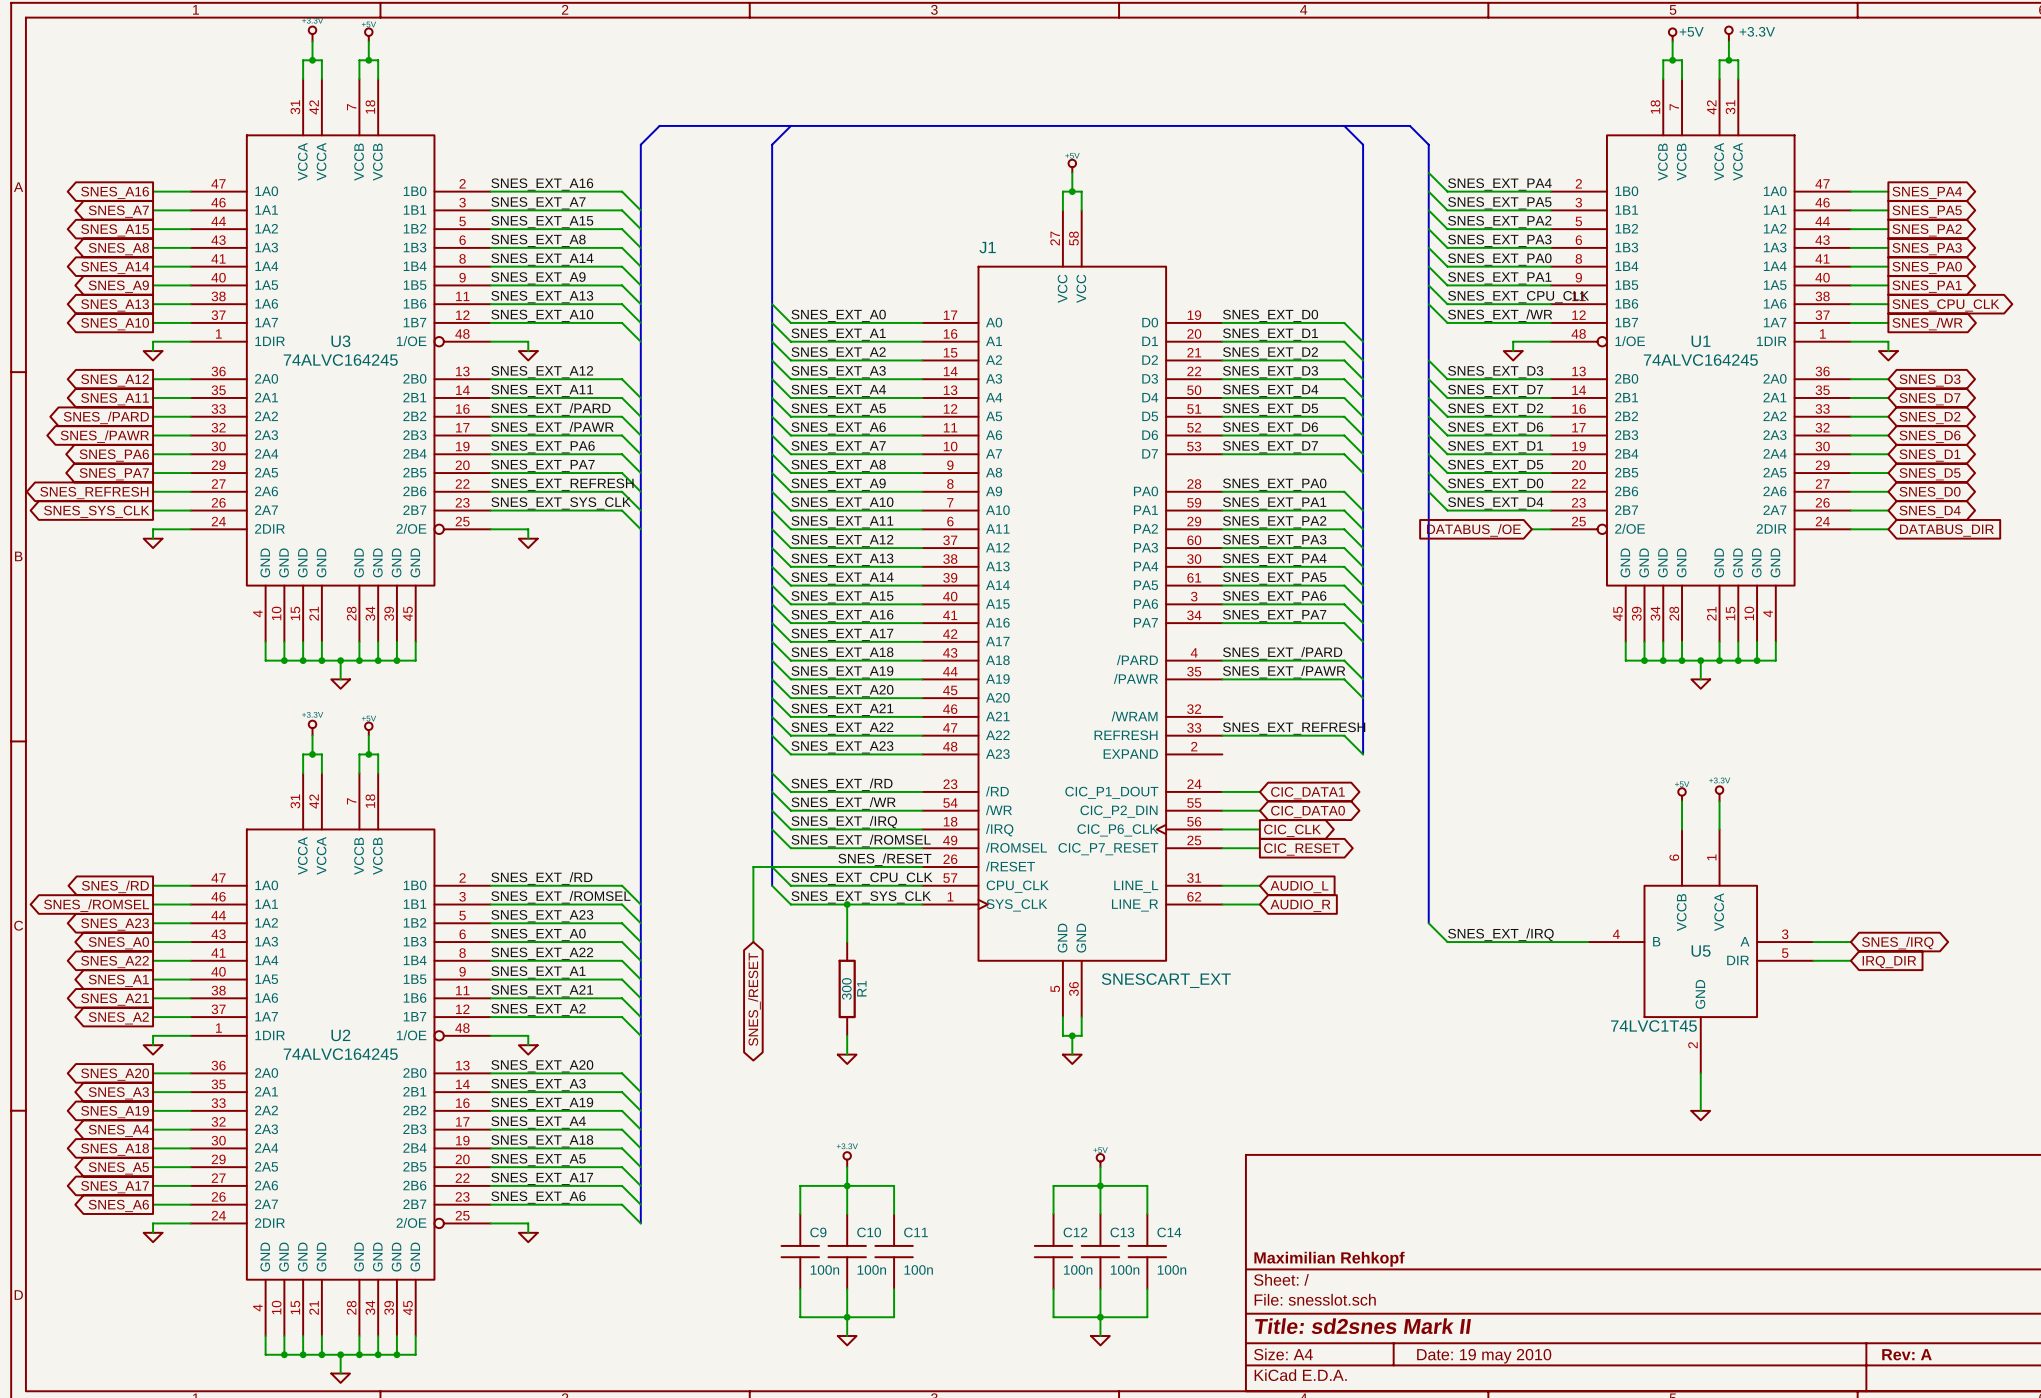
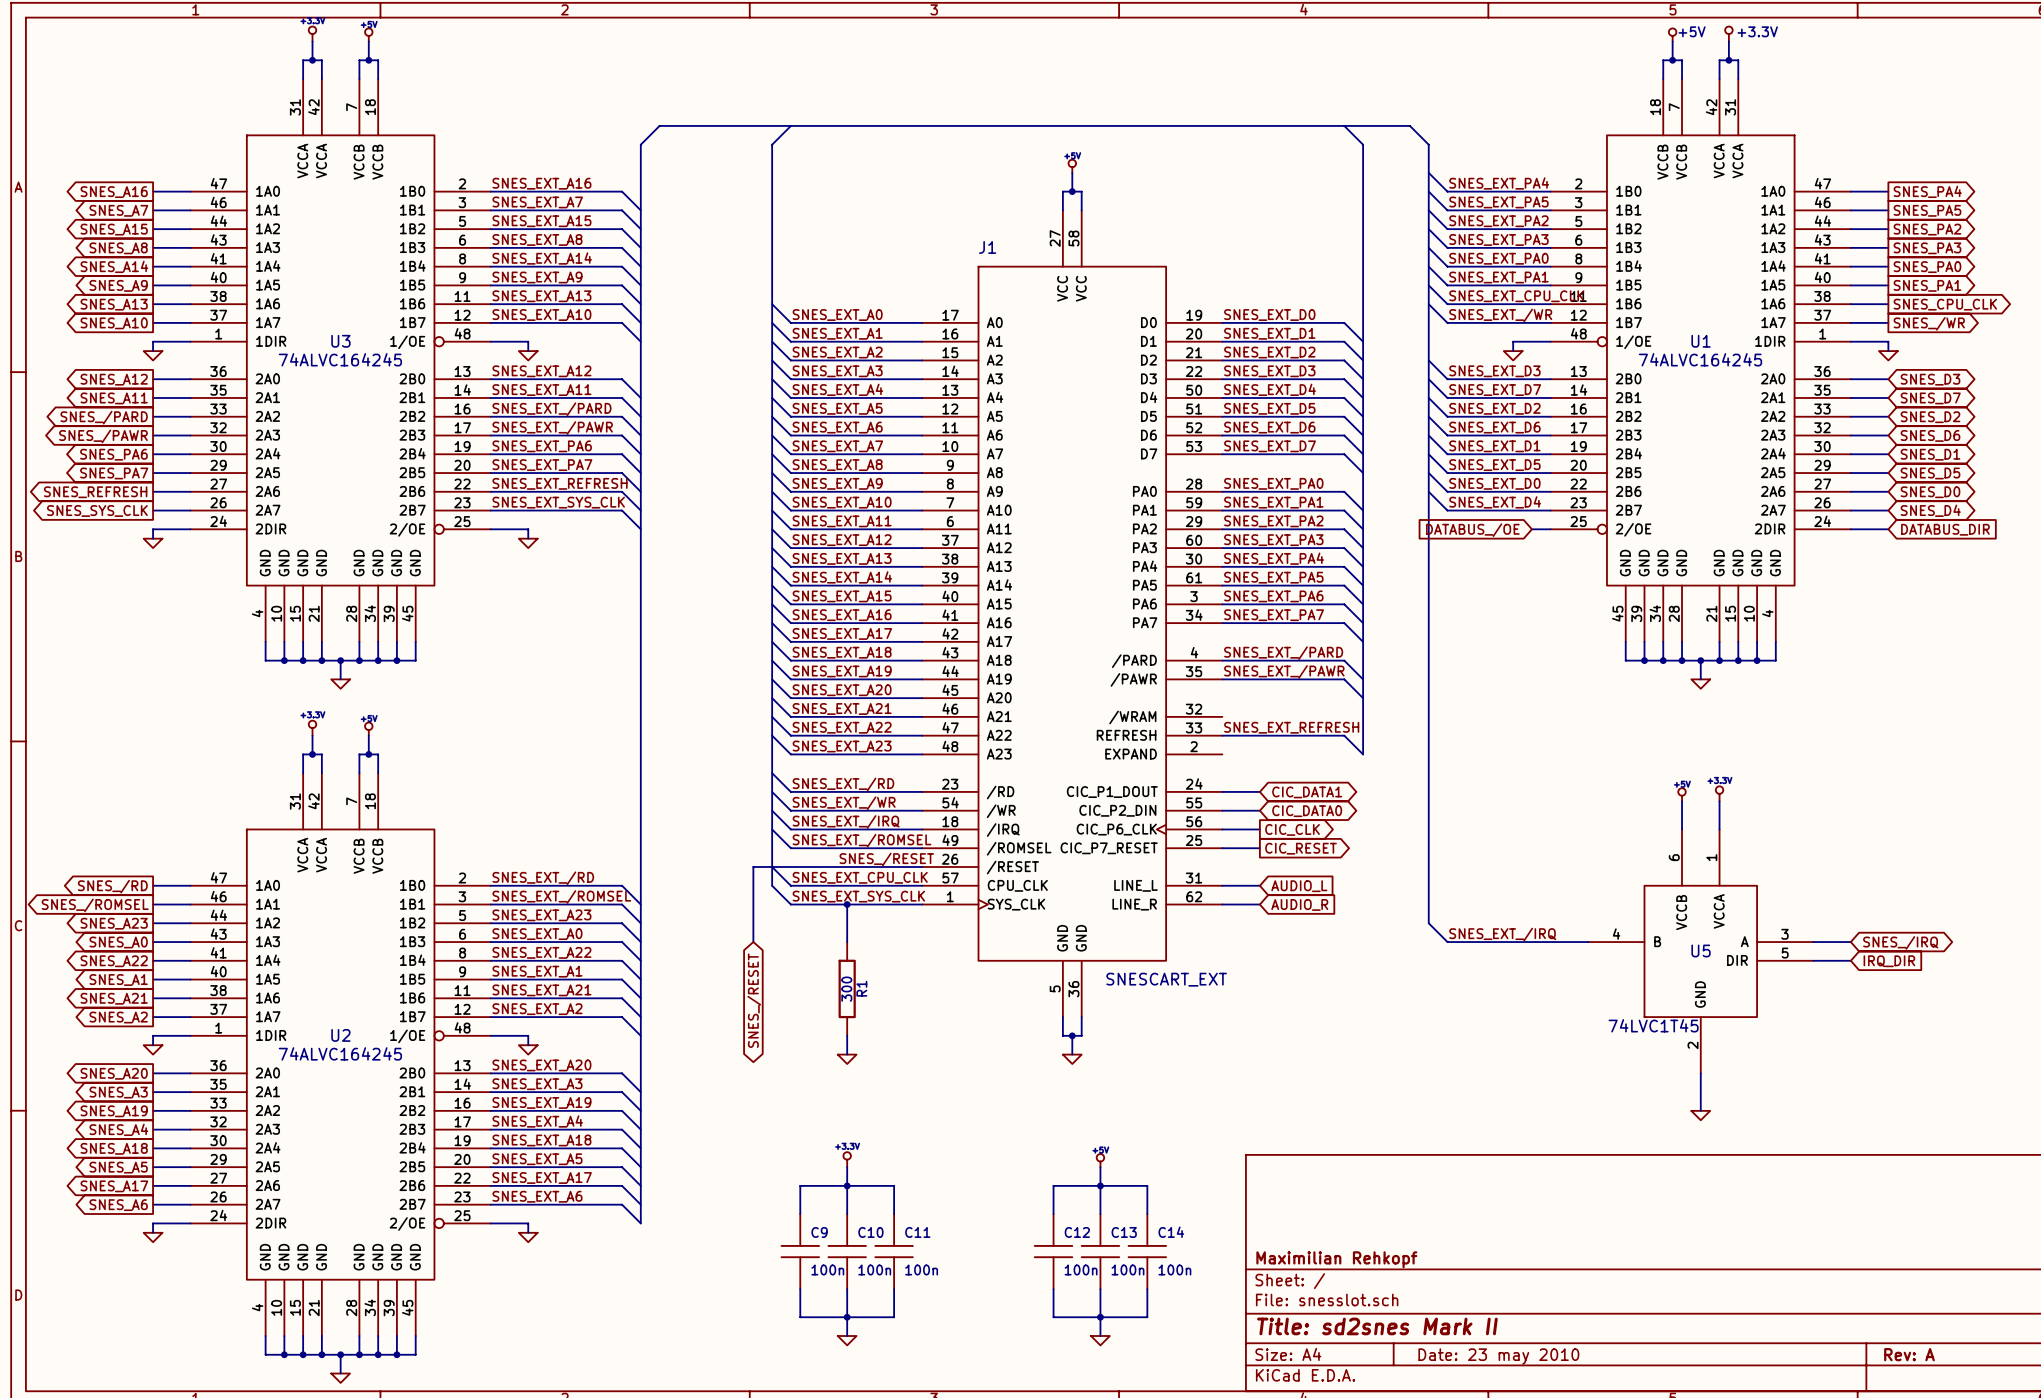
title block: Date: 19 may 2010 (1484, 1356) -> Date: 23 may 2010 (1498, 1356)

